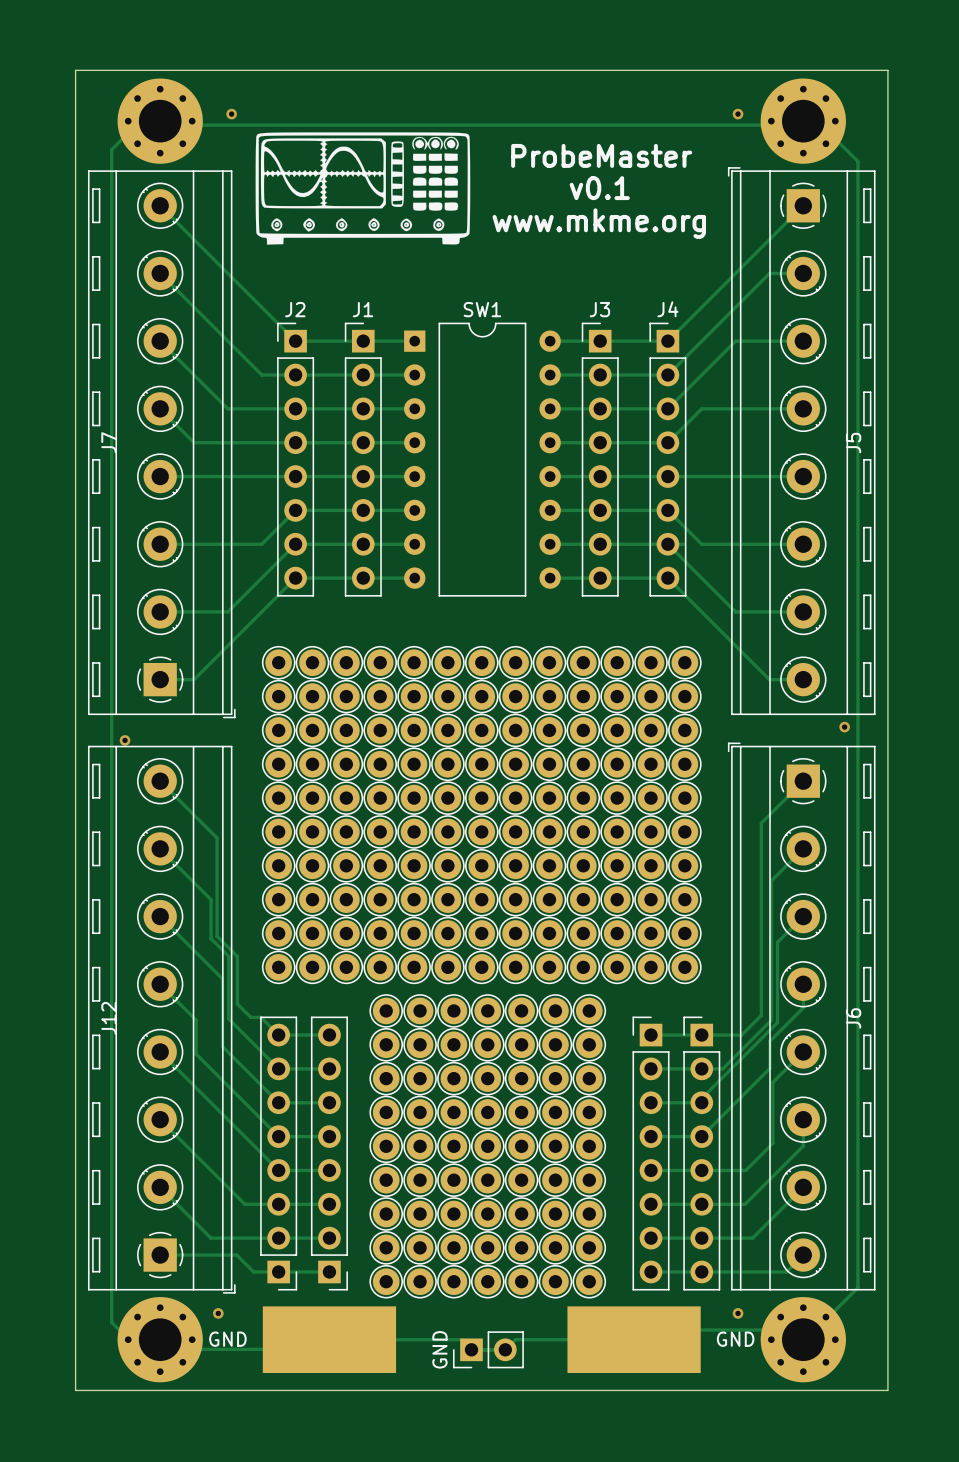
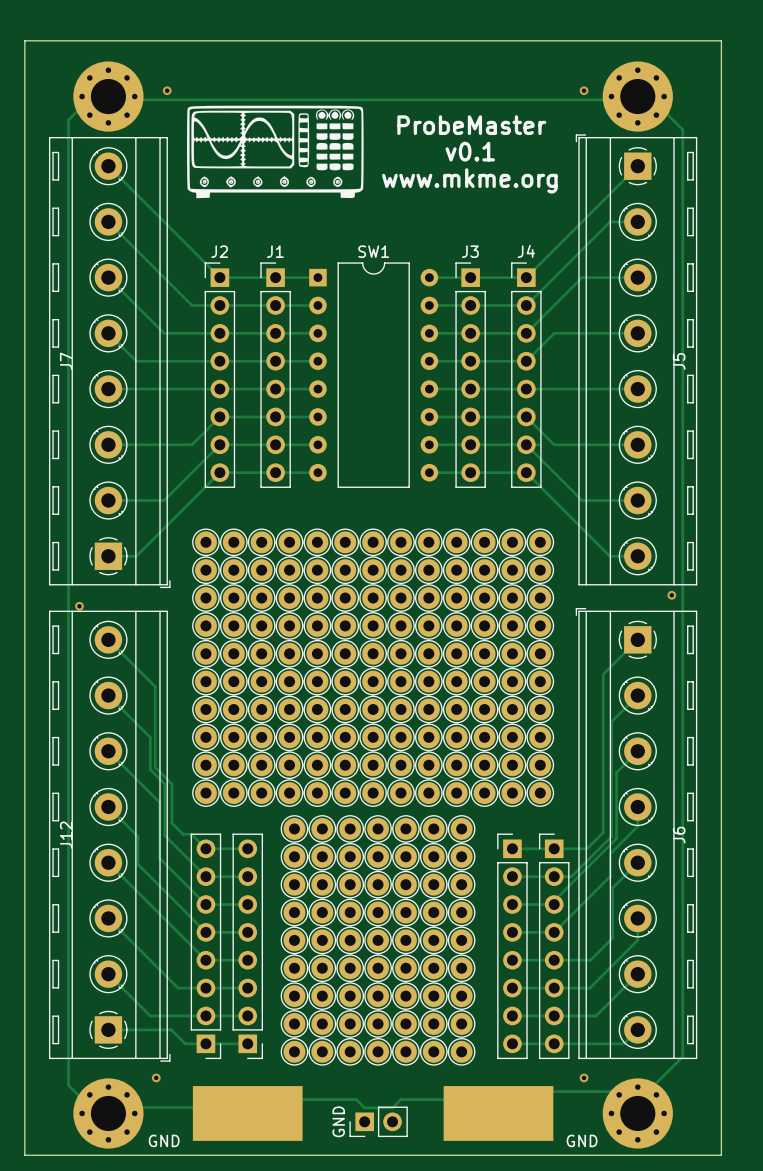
board edge: (75, 70) (887, 70) (887, 1390) (75, 1390) (75, 70) -> (24, 40) (24, 1155) (721, 1155) (721, 40) (24, 40)
part position: (160, 1339) -> (108, 1113)
text position: GND (227, 1339) -> GND (164, 1140)
part position: (329, 1339) -> (247, 1113)
part position: (634, 1339) -> (498, 1113)
text position: GND (735, 1339) -> GND (582, 1140)
part position: (803, 1339) -> (637, 1113)
GND position: (488, 1349) -> (378, 1121)

